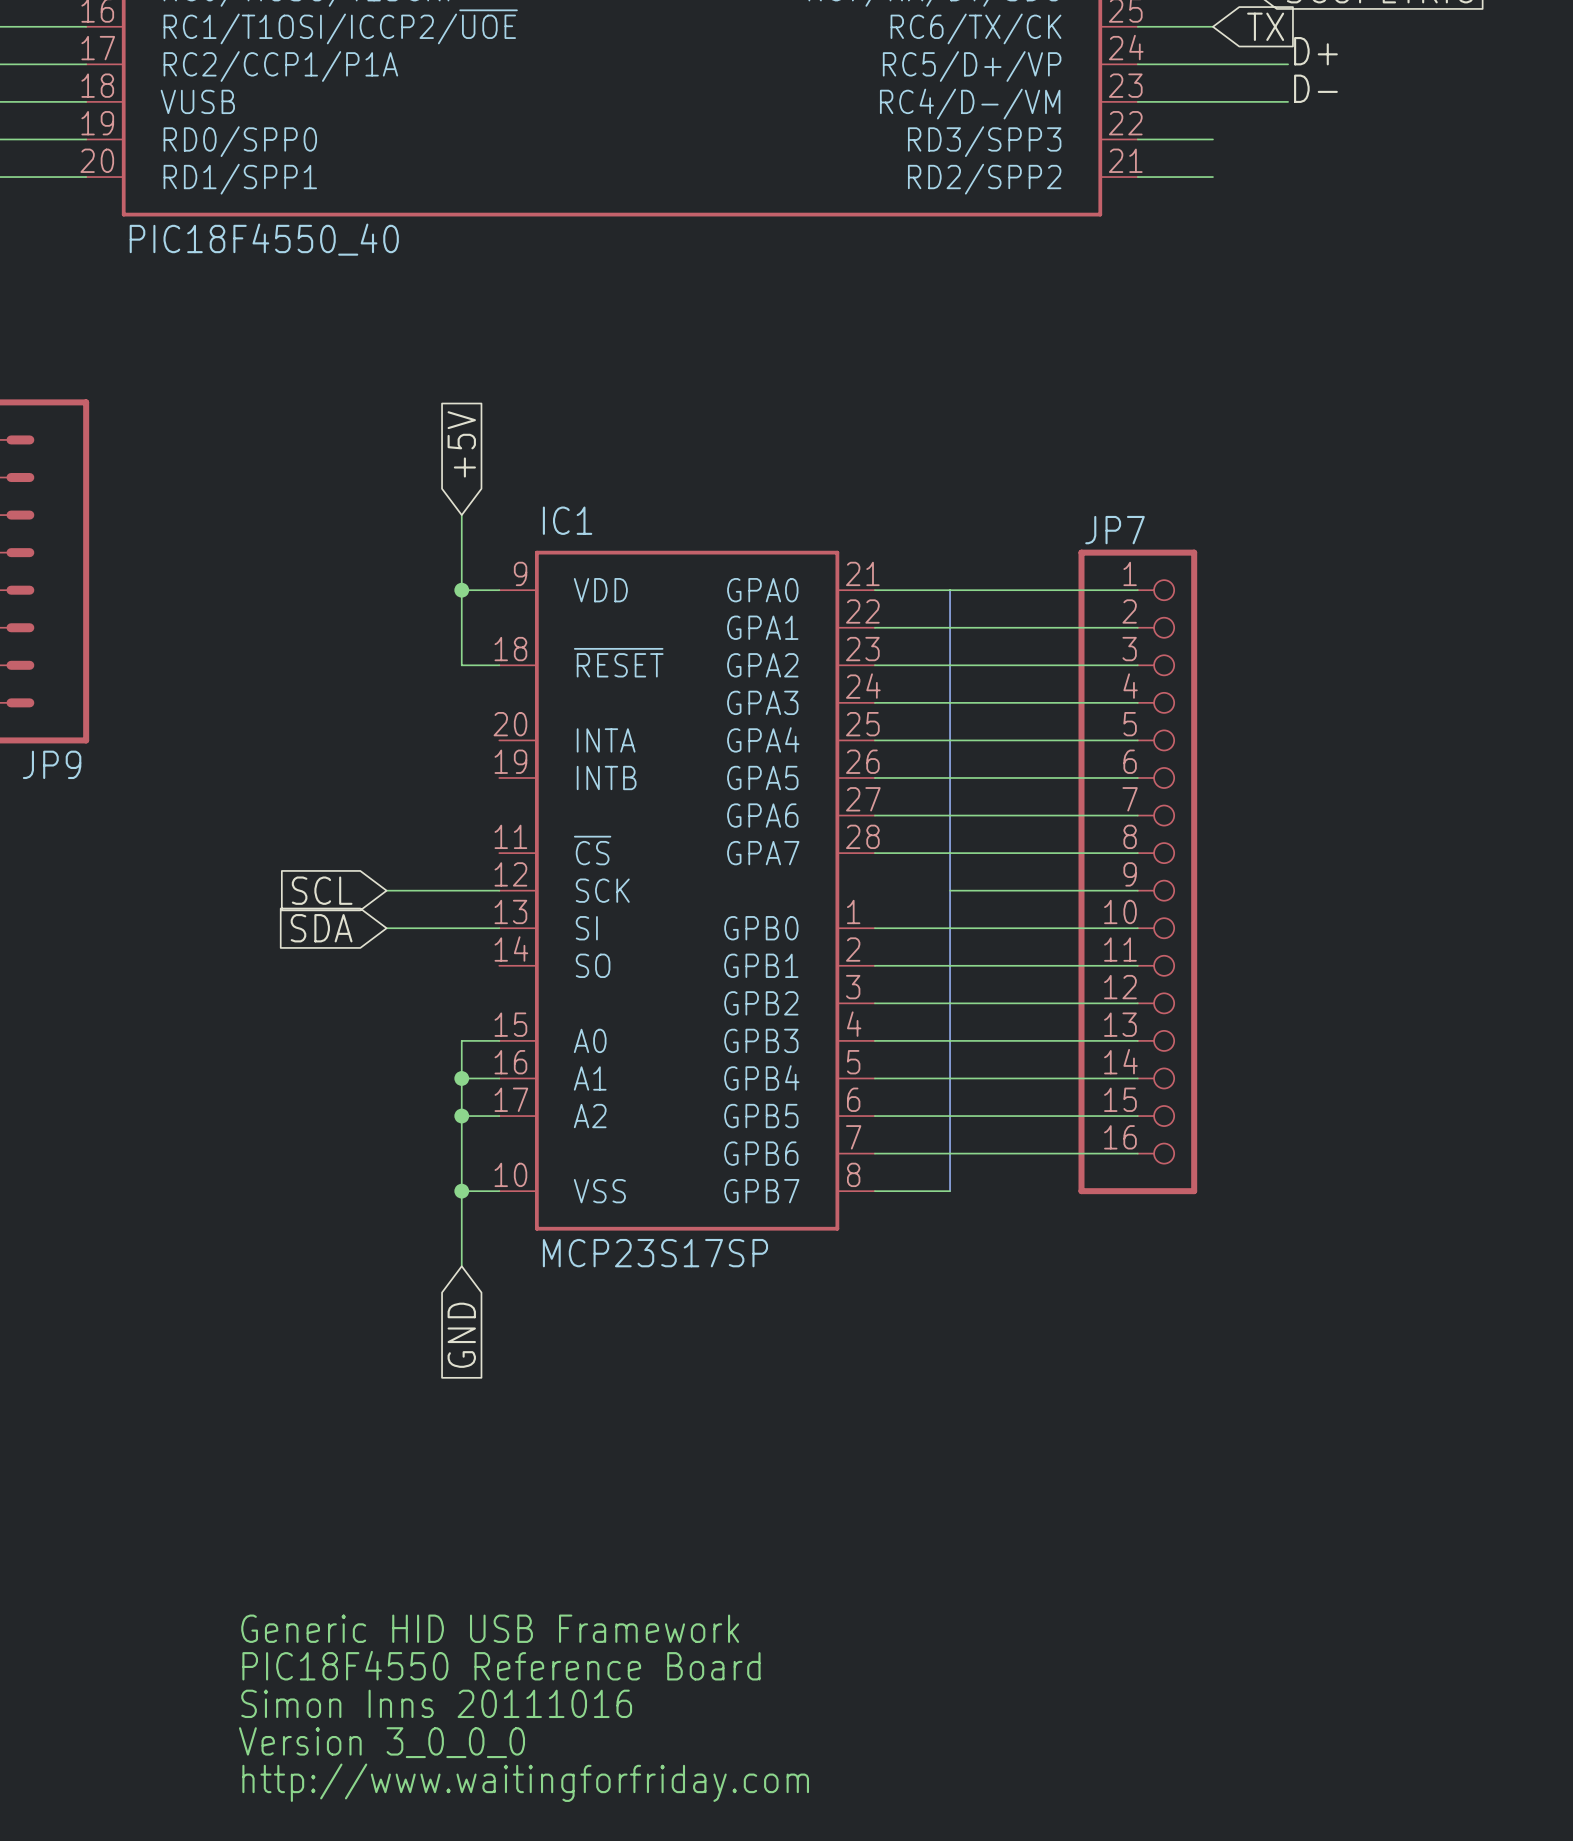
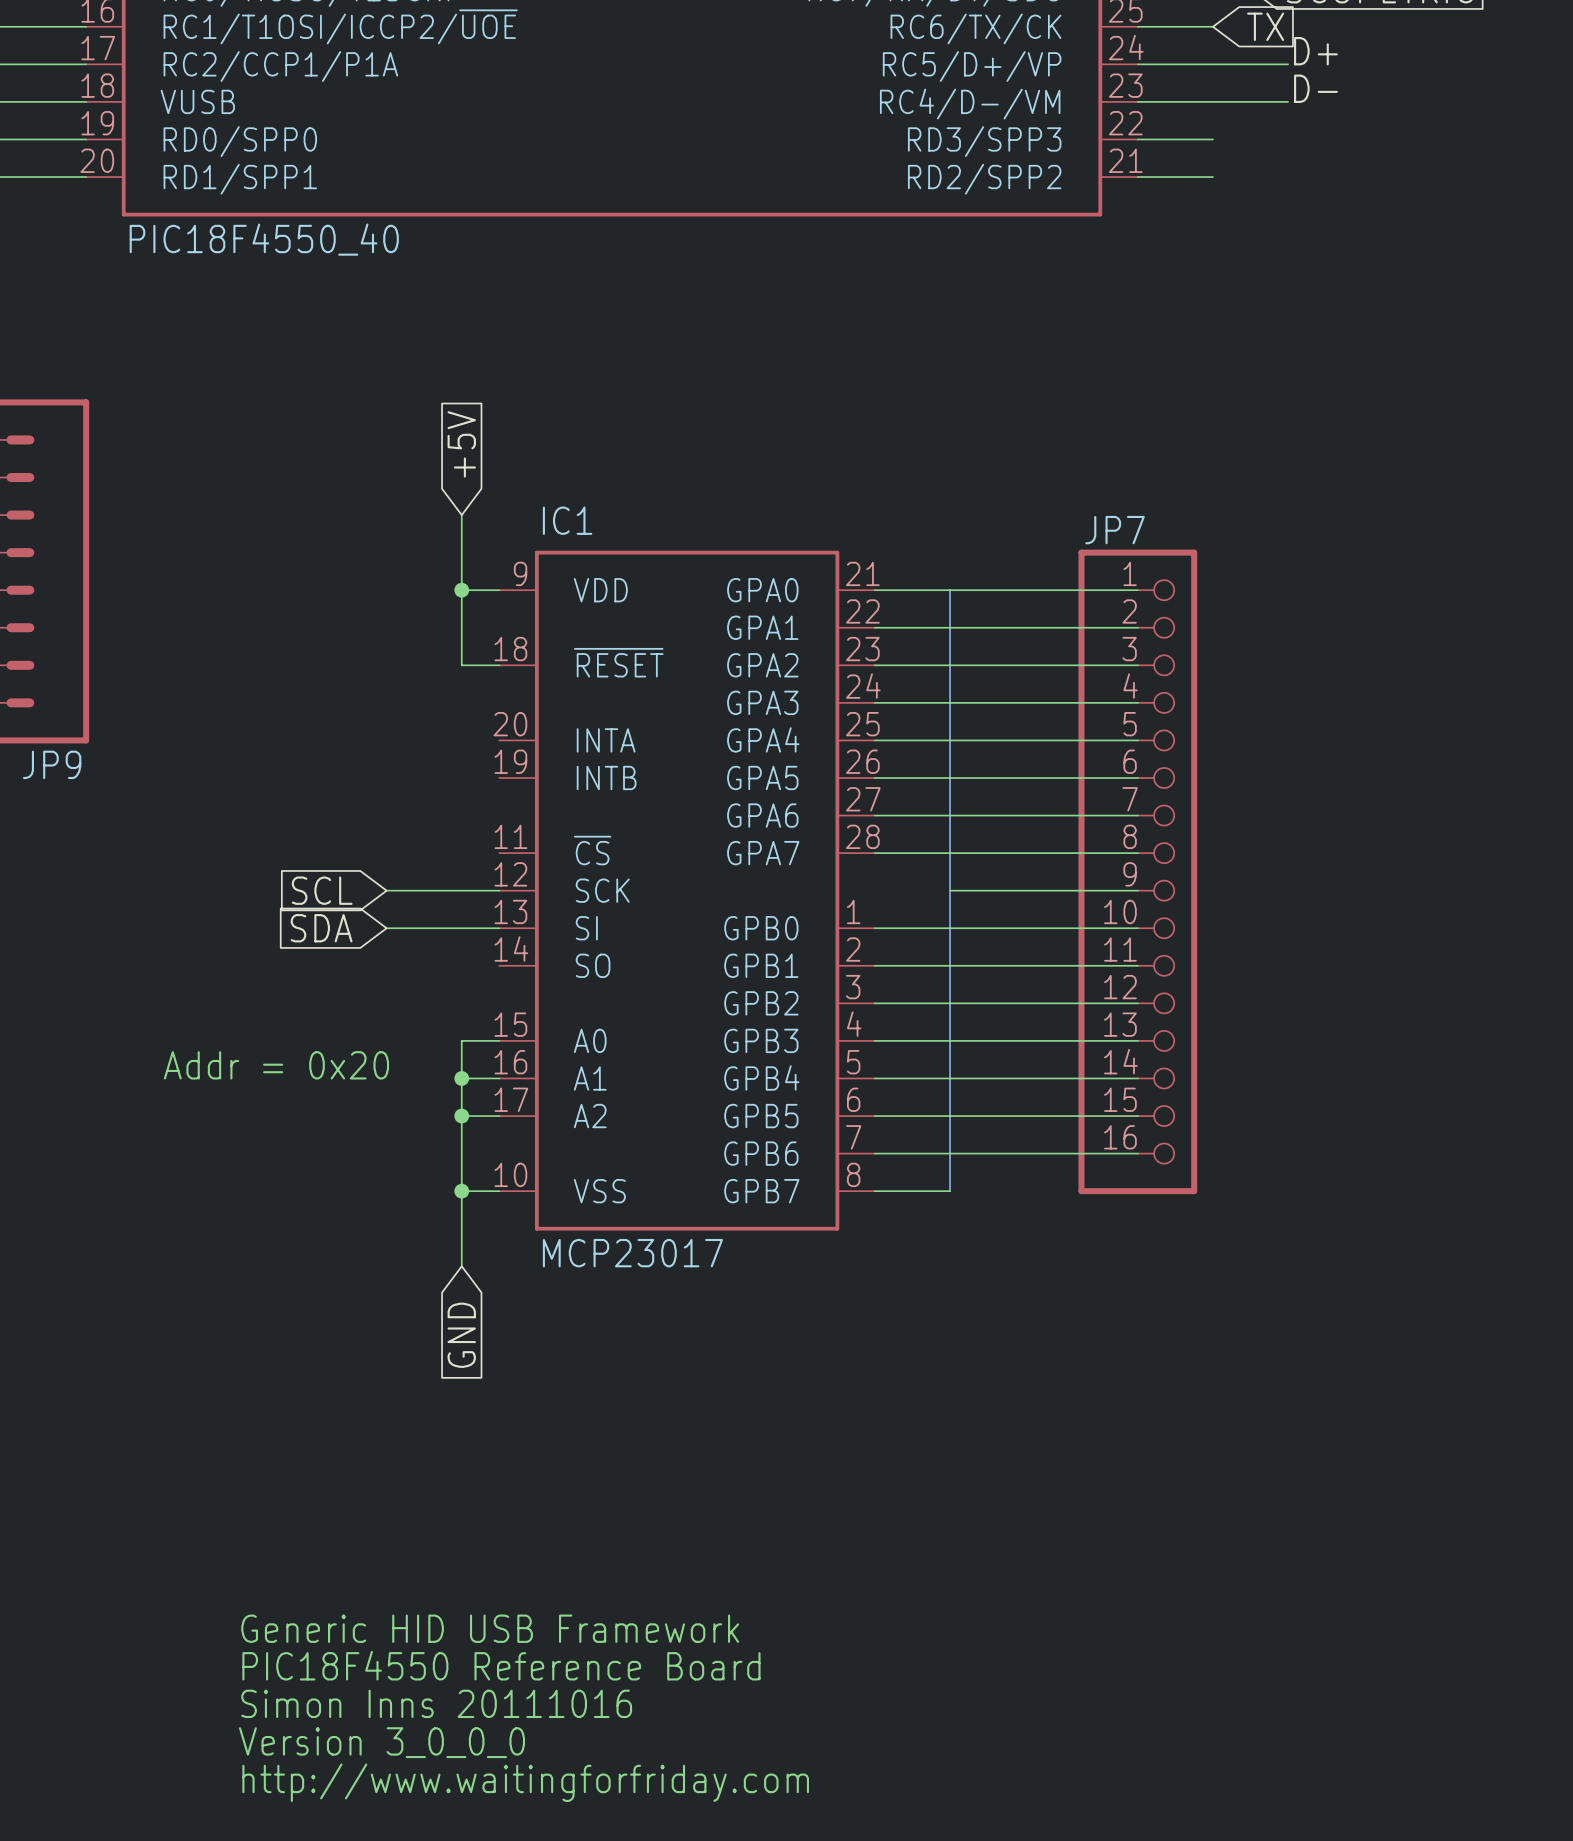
text: none -> Addr = 0x20 (276, 1065)
IC1 value: MCP23S17SP (655, 1253) -> MCP23017 (632, 1253)

